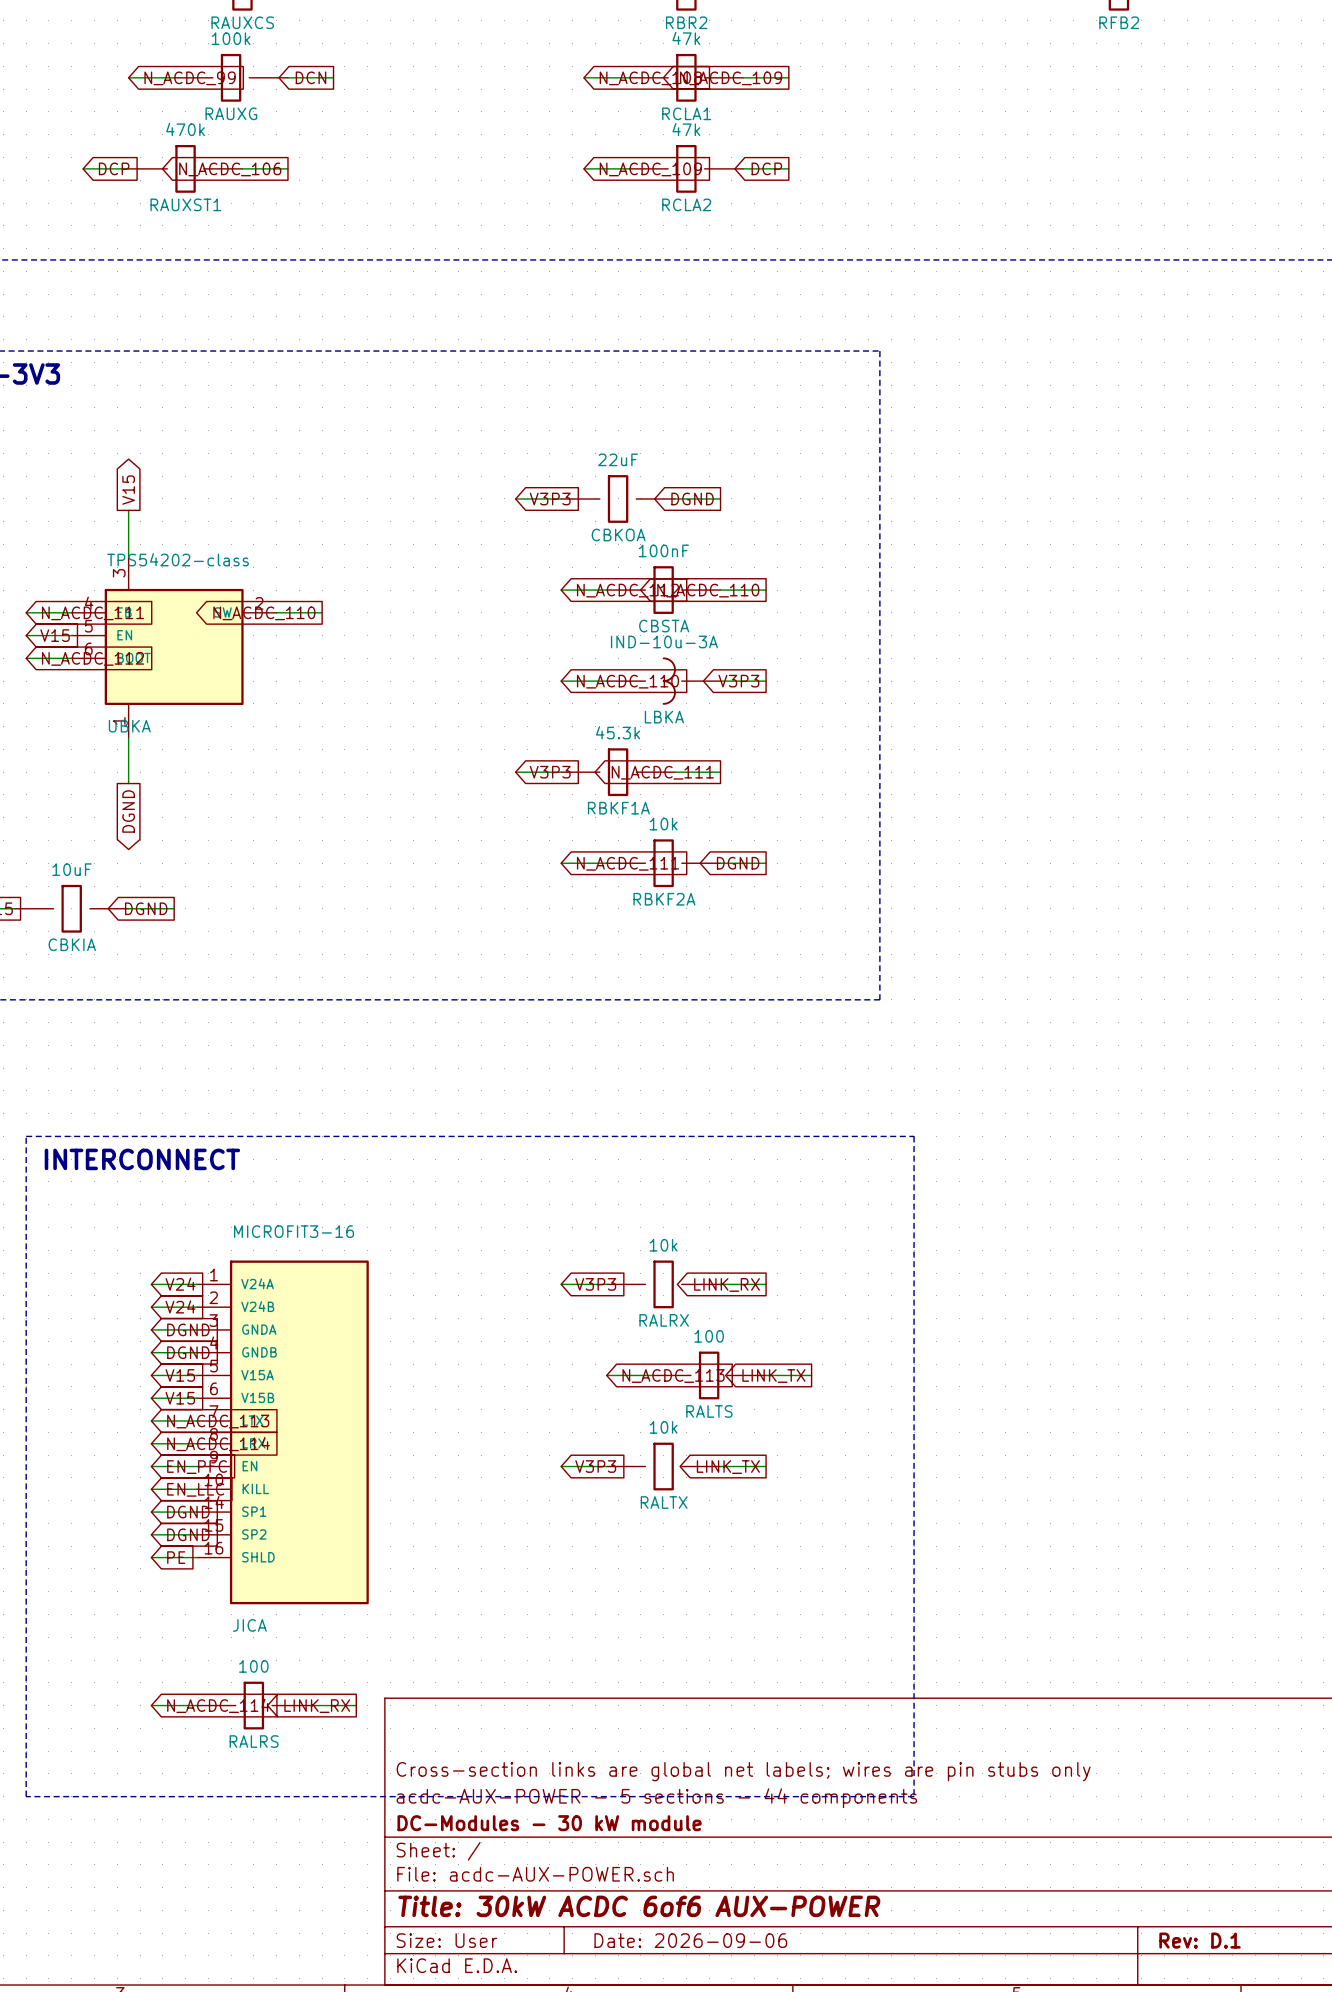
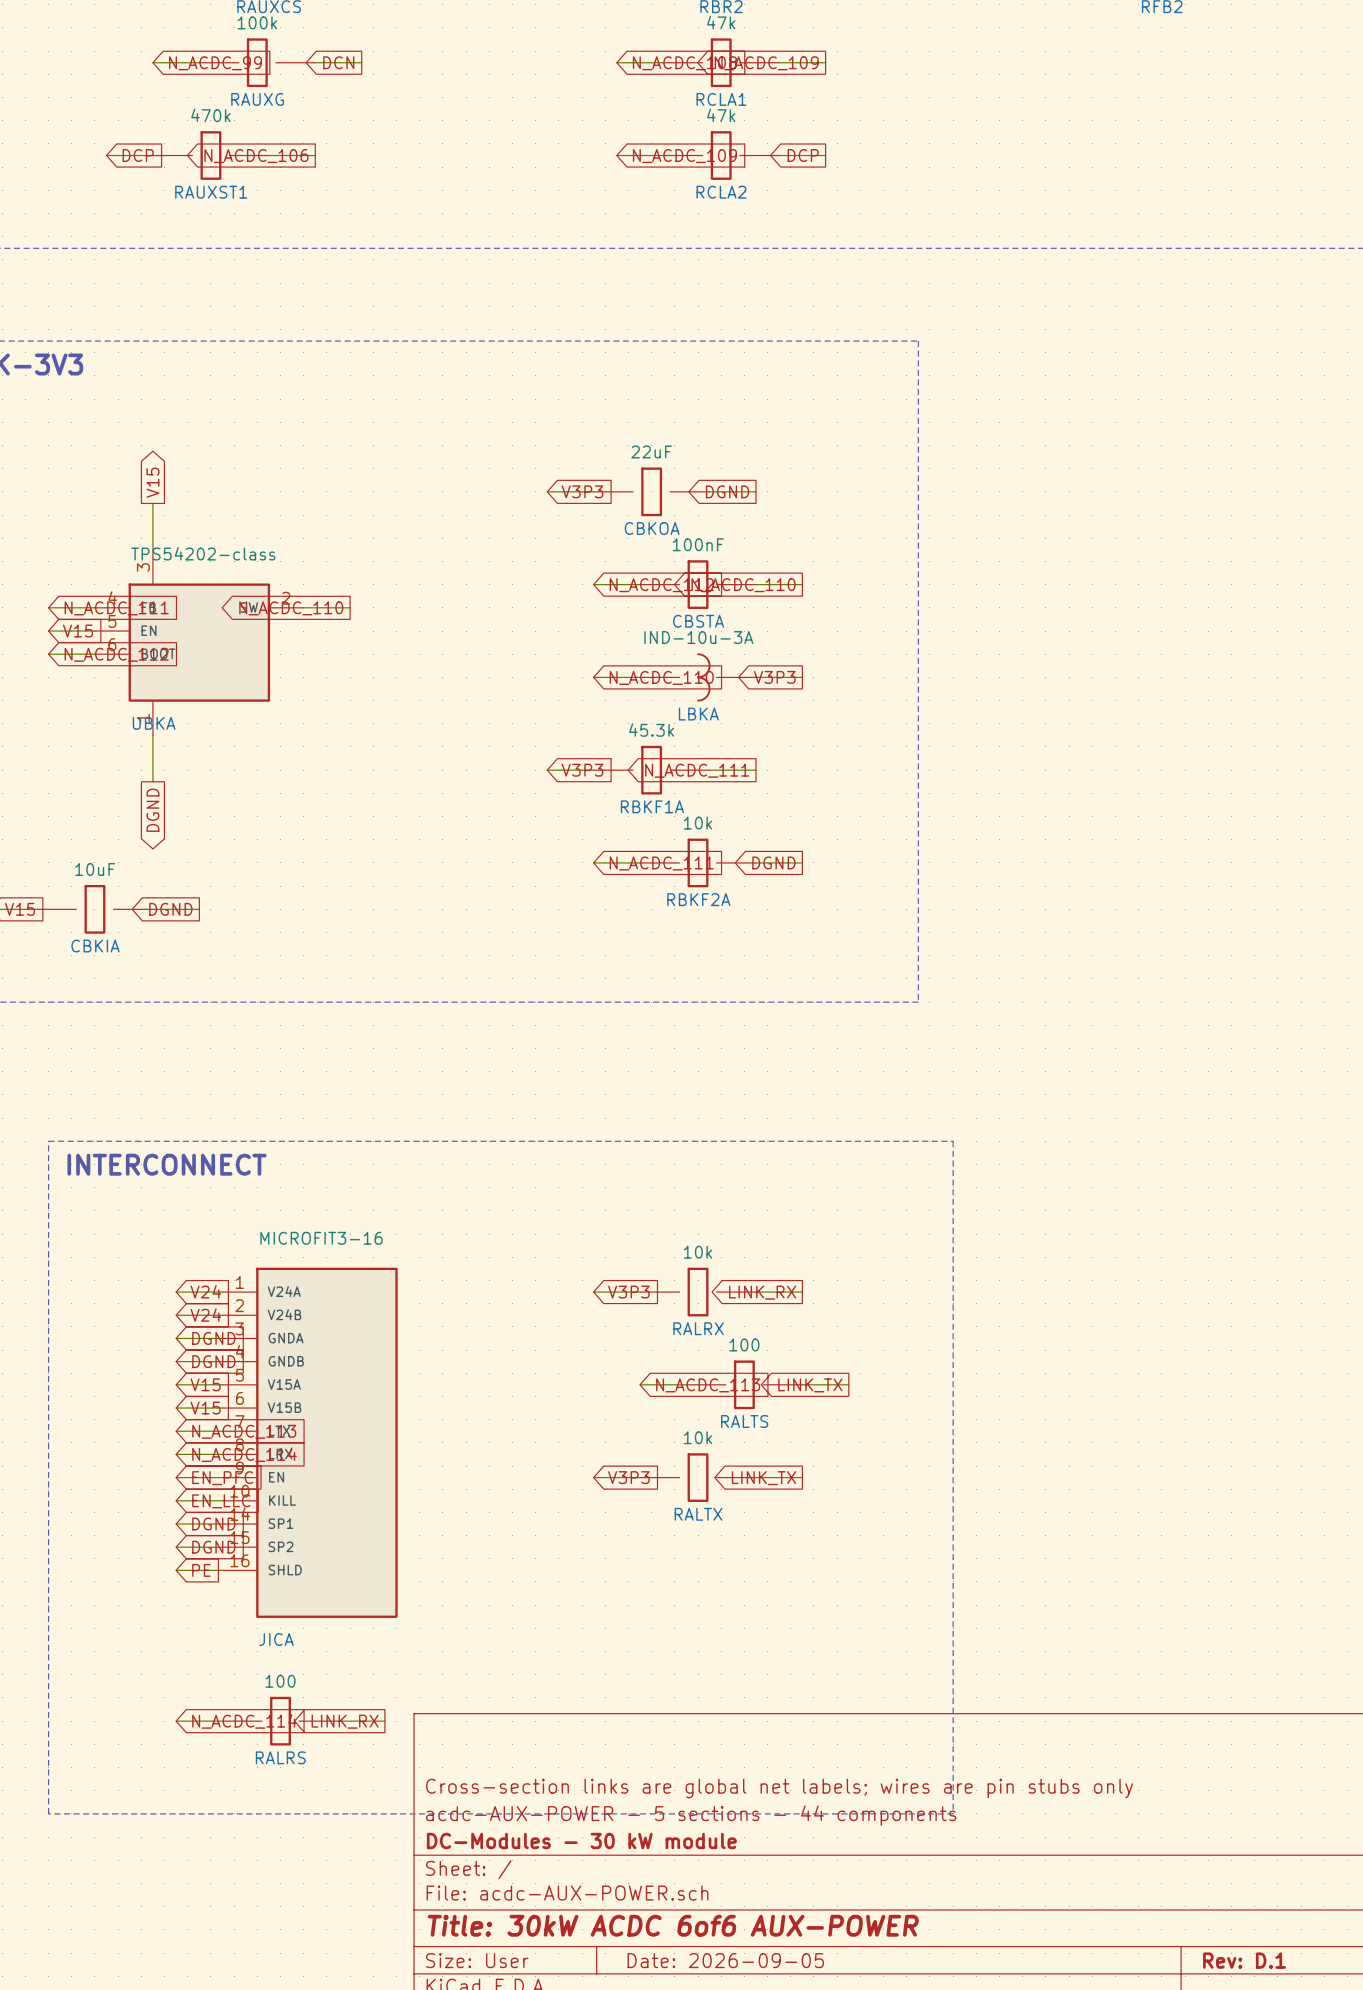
title block: Date: 2026-09-06 (690, 1940) -> Date: 2026-09-05 (725, 1960)

